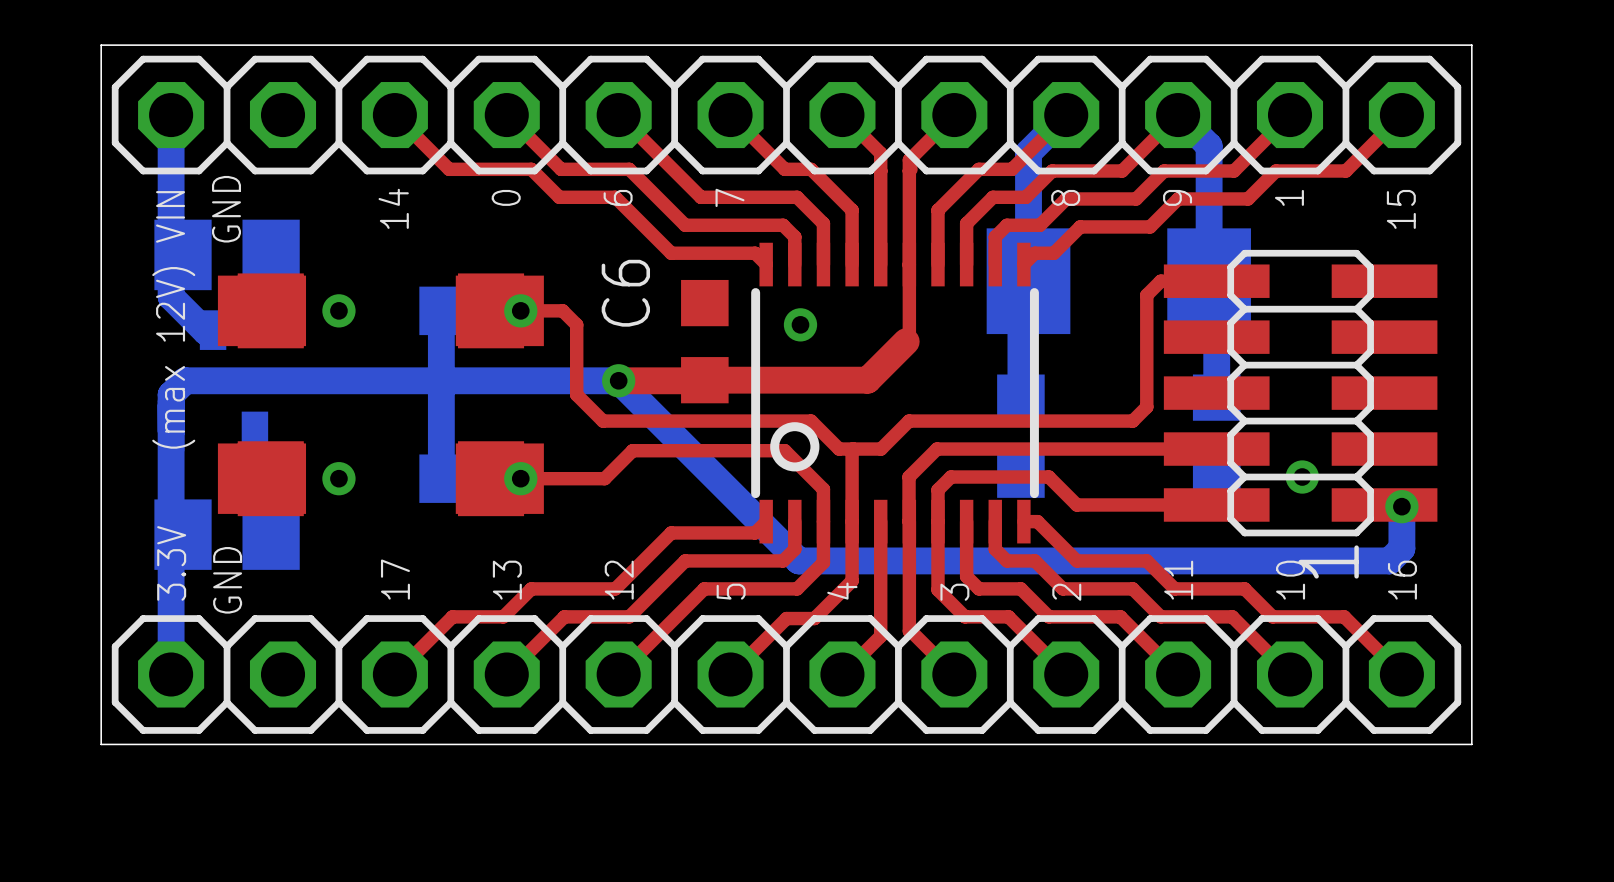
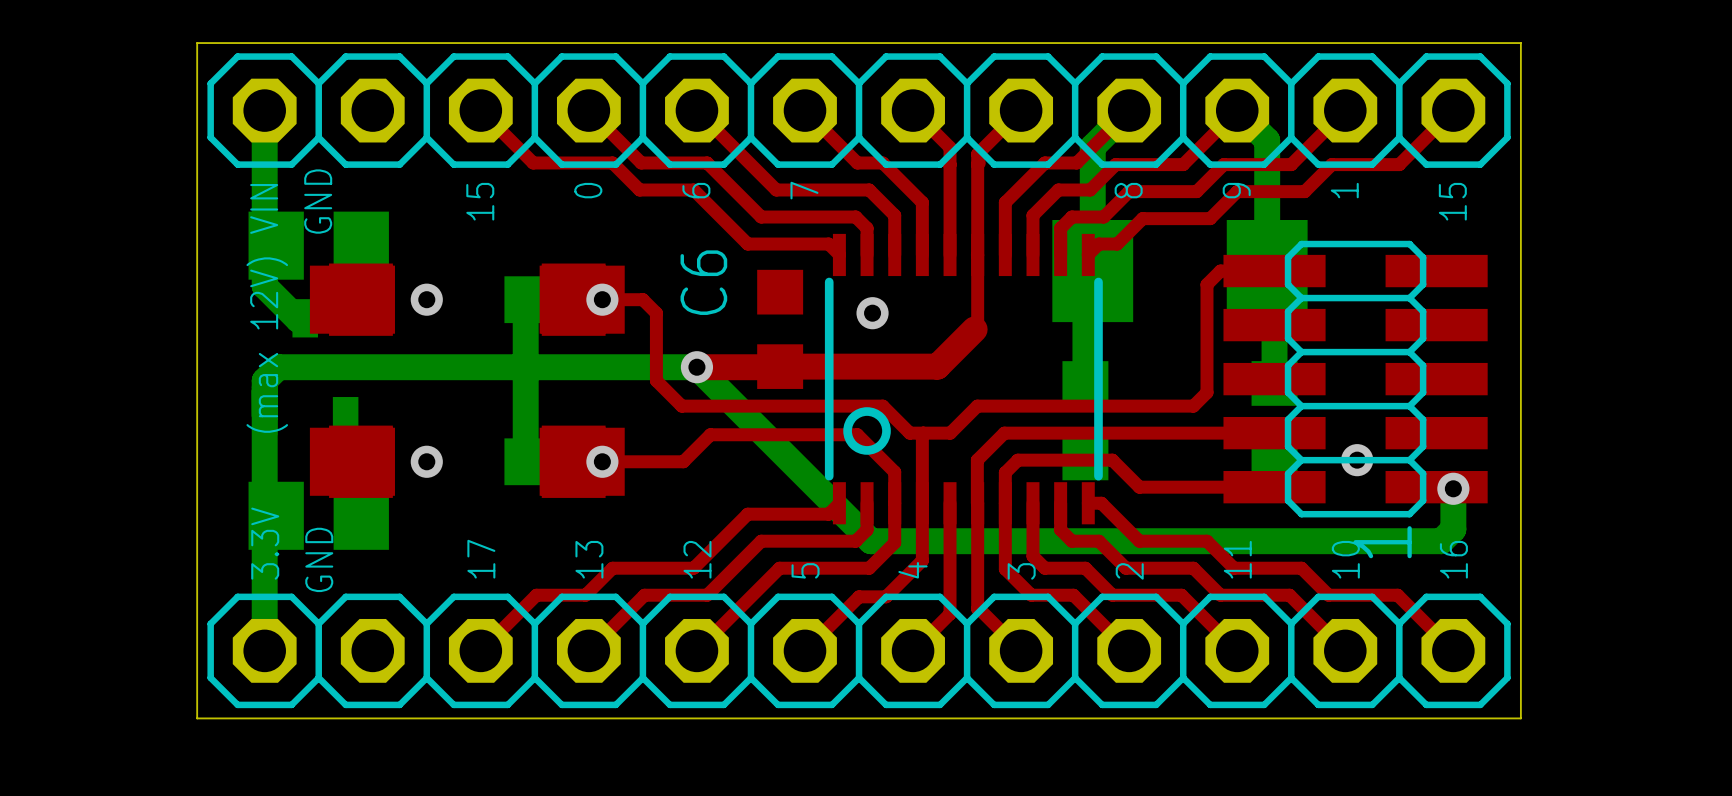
text: 14 (393, 208) -> 15 (480, 201)

